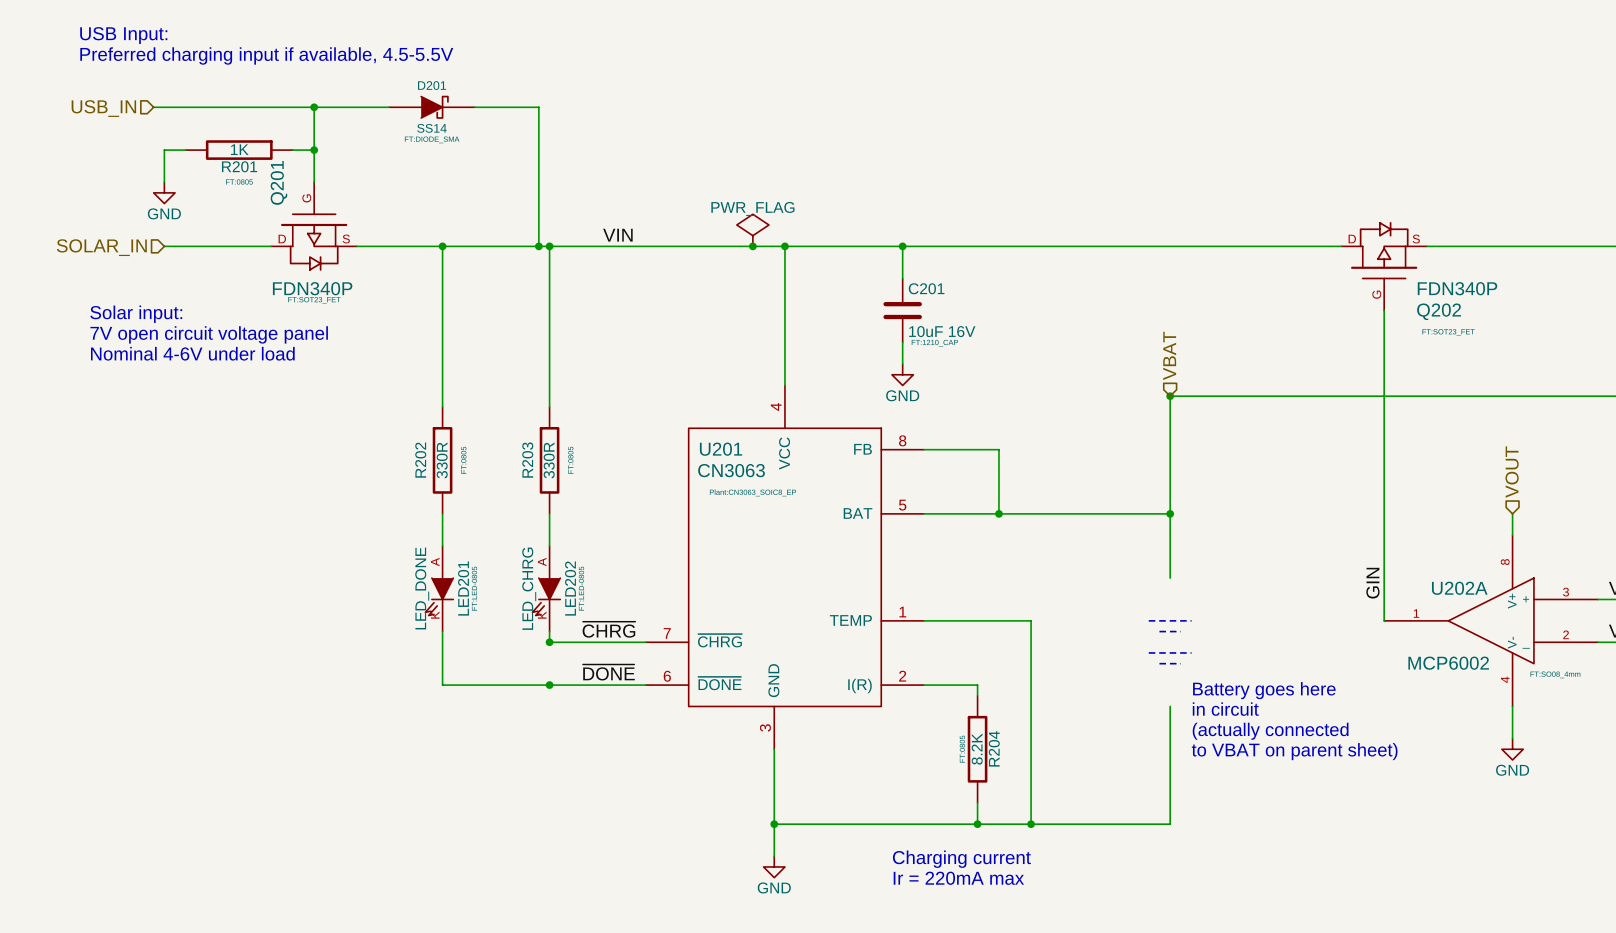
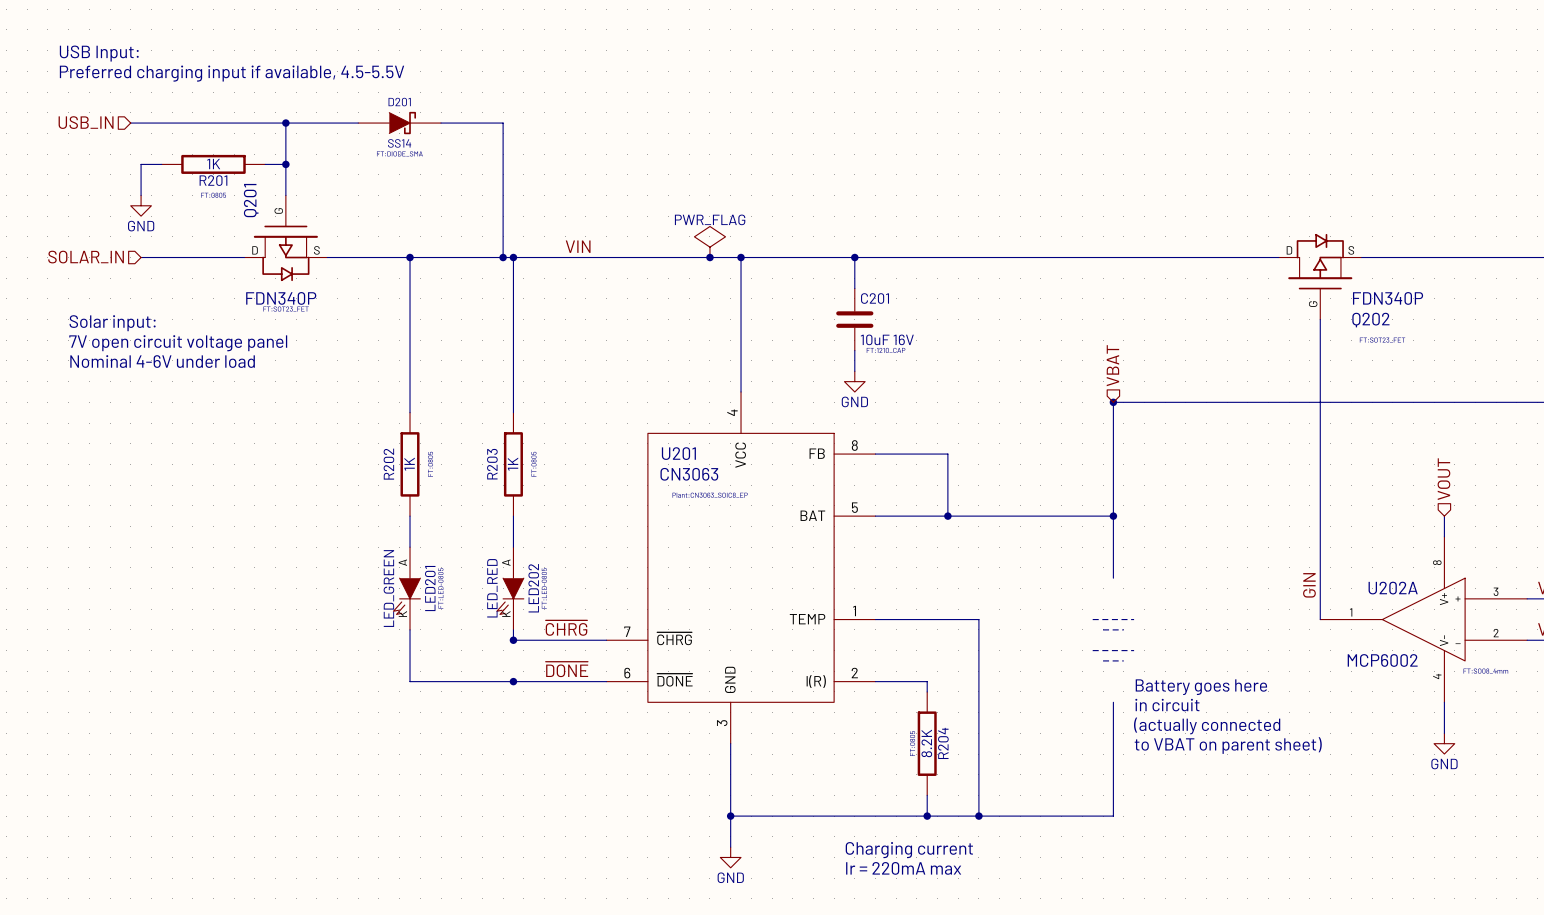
R202 value: 330R (442, 460) -> 1K (409, 464)
R203 value: 330R (549, 460) -> 1K (513, 464)
LED201 value: LED_DONE (422, 588) -> LED_GREEN (388, 588)
LED202 value: LED_CHRG (529, 588) -> LED_RED (492, 588)

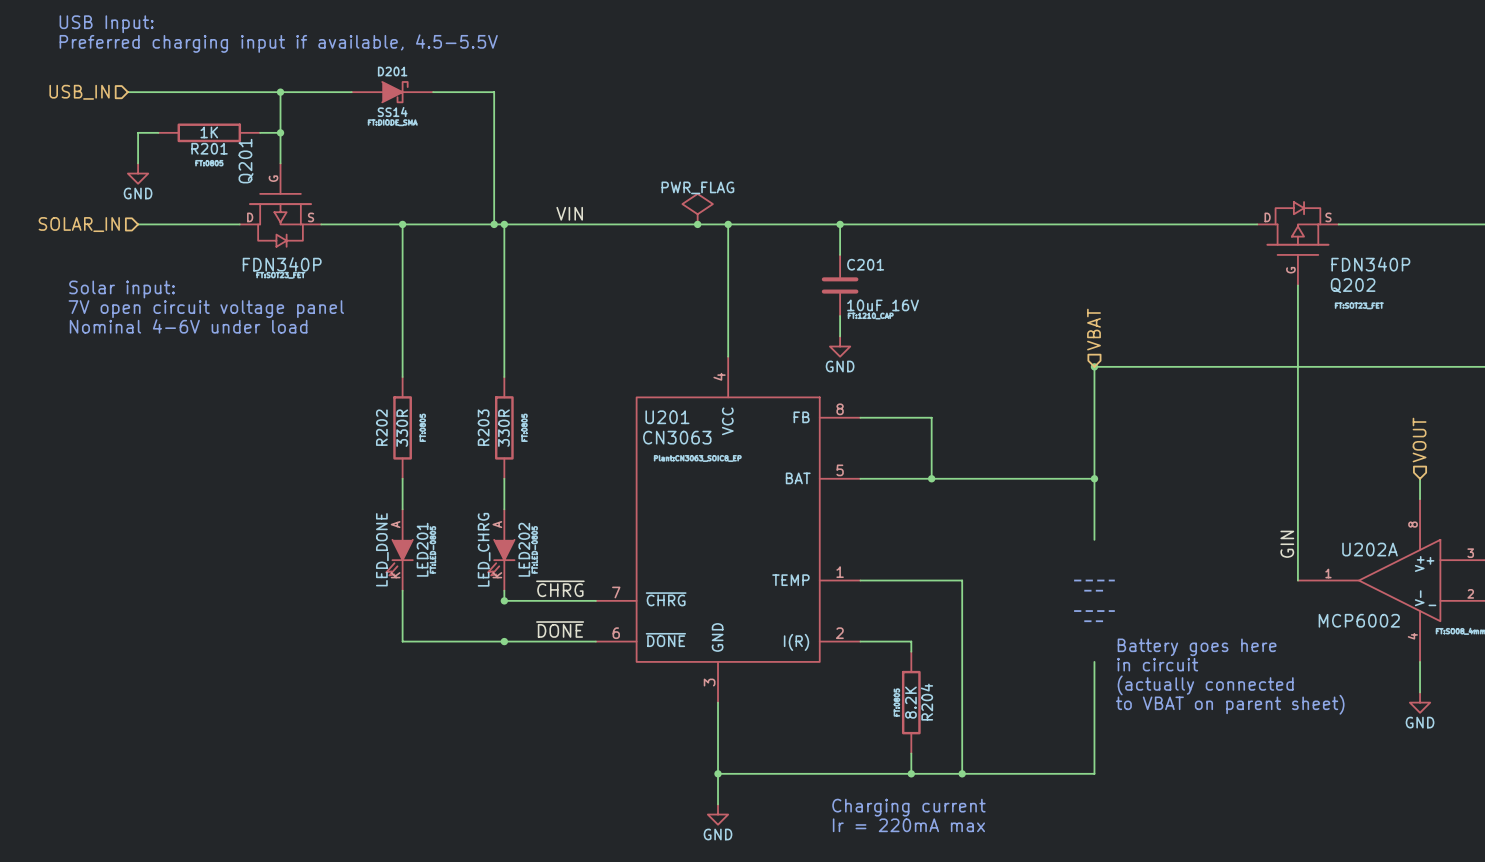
R202 value: 1K (409, 464) -> 330R (402, 428)
R203 value: 1K (513, 464) -> 330R (503, 428)
LED201 value: LED_GREEN (388, 588) -> LED_DONE (382, 549)
LED202 value: LED_RED (492, 588) -> LED_CHRG (484, 549)

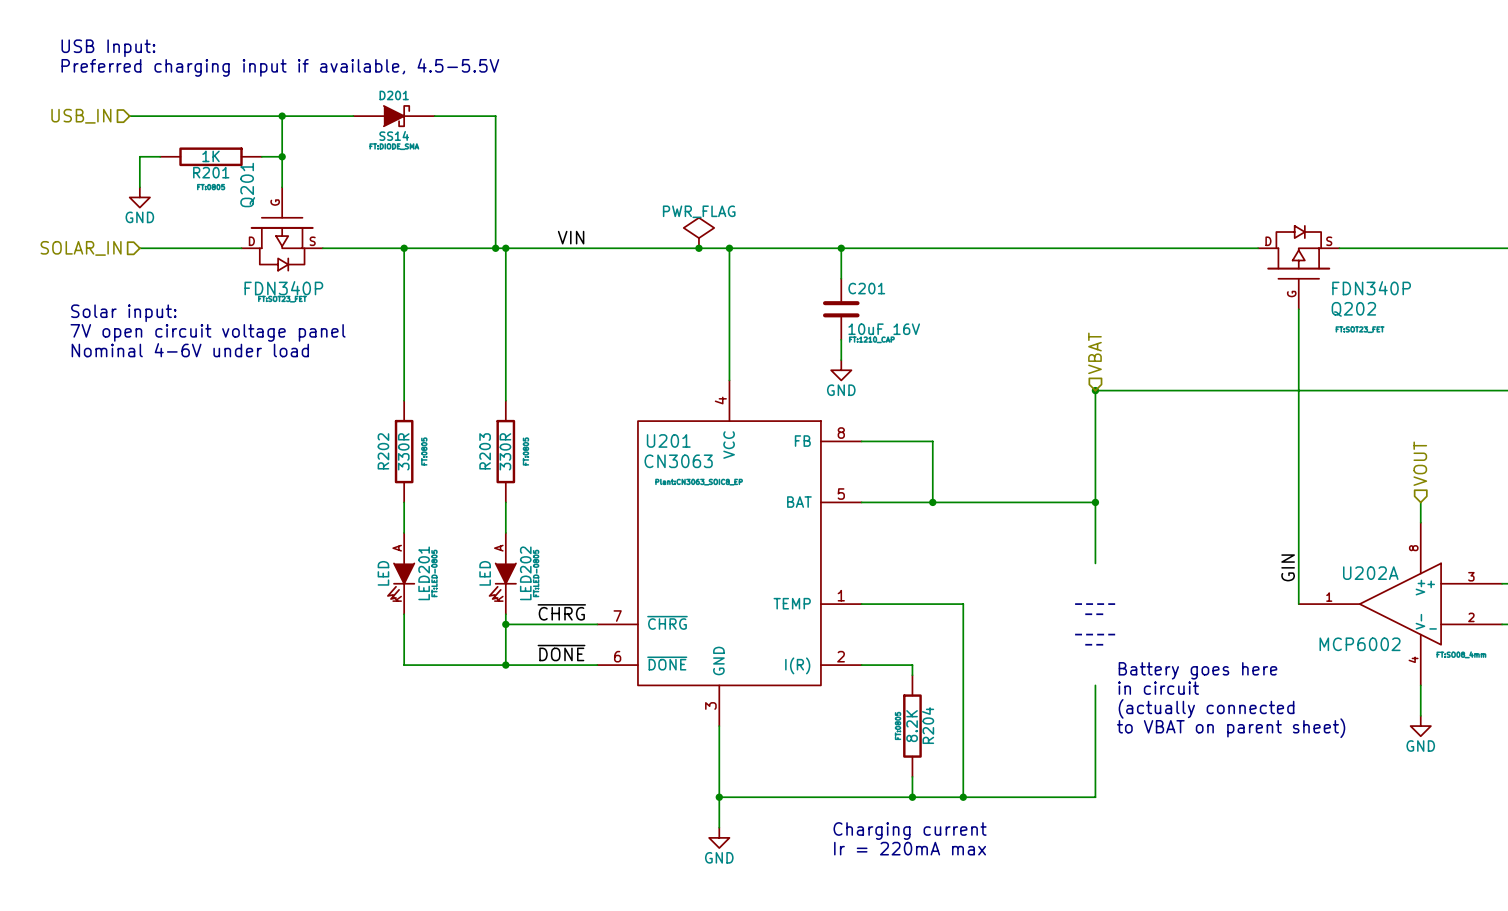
LED201 value: LED_DONE (382, 549) -> LED (383, 573)
LED202 value: LED_CHRG (484, 549) -> LED (485, 573)
wire: none -> (505, 624) (505, 665)

